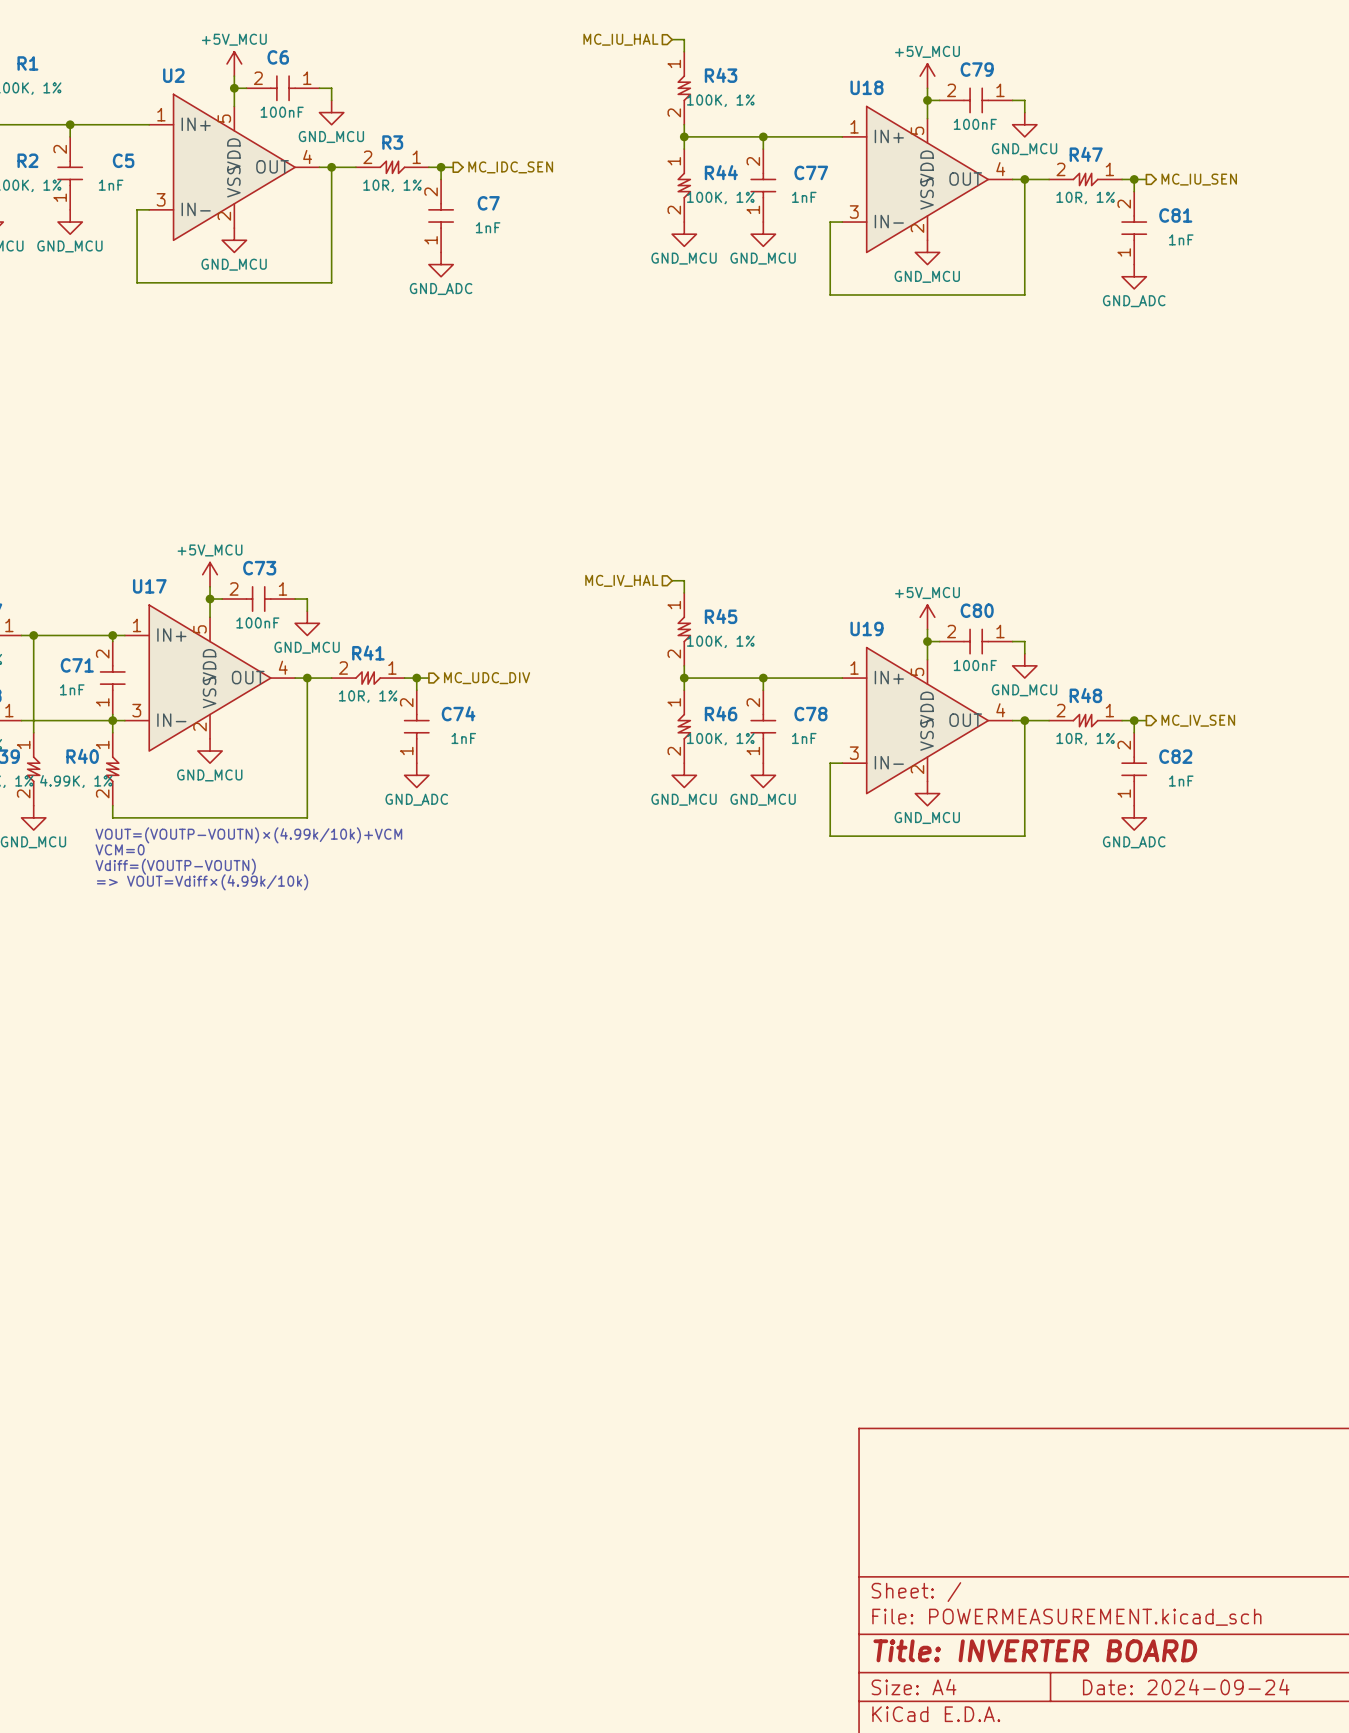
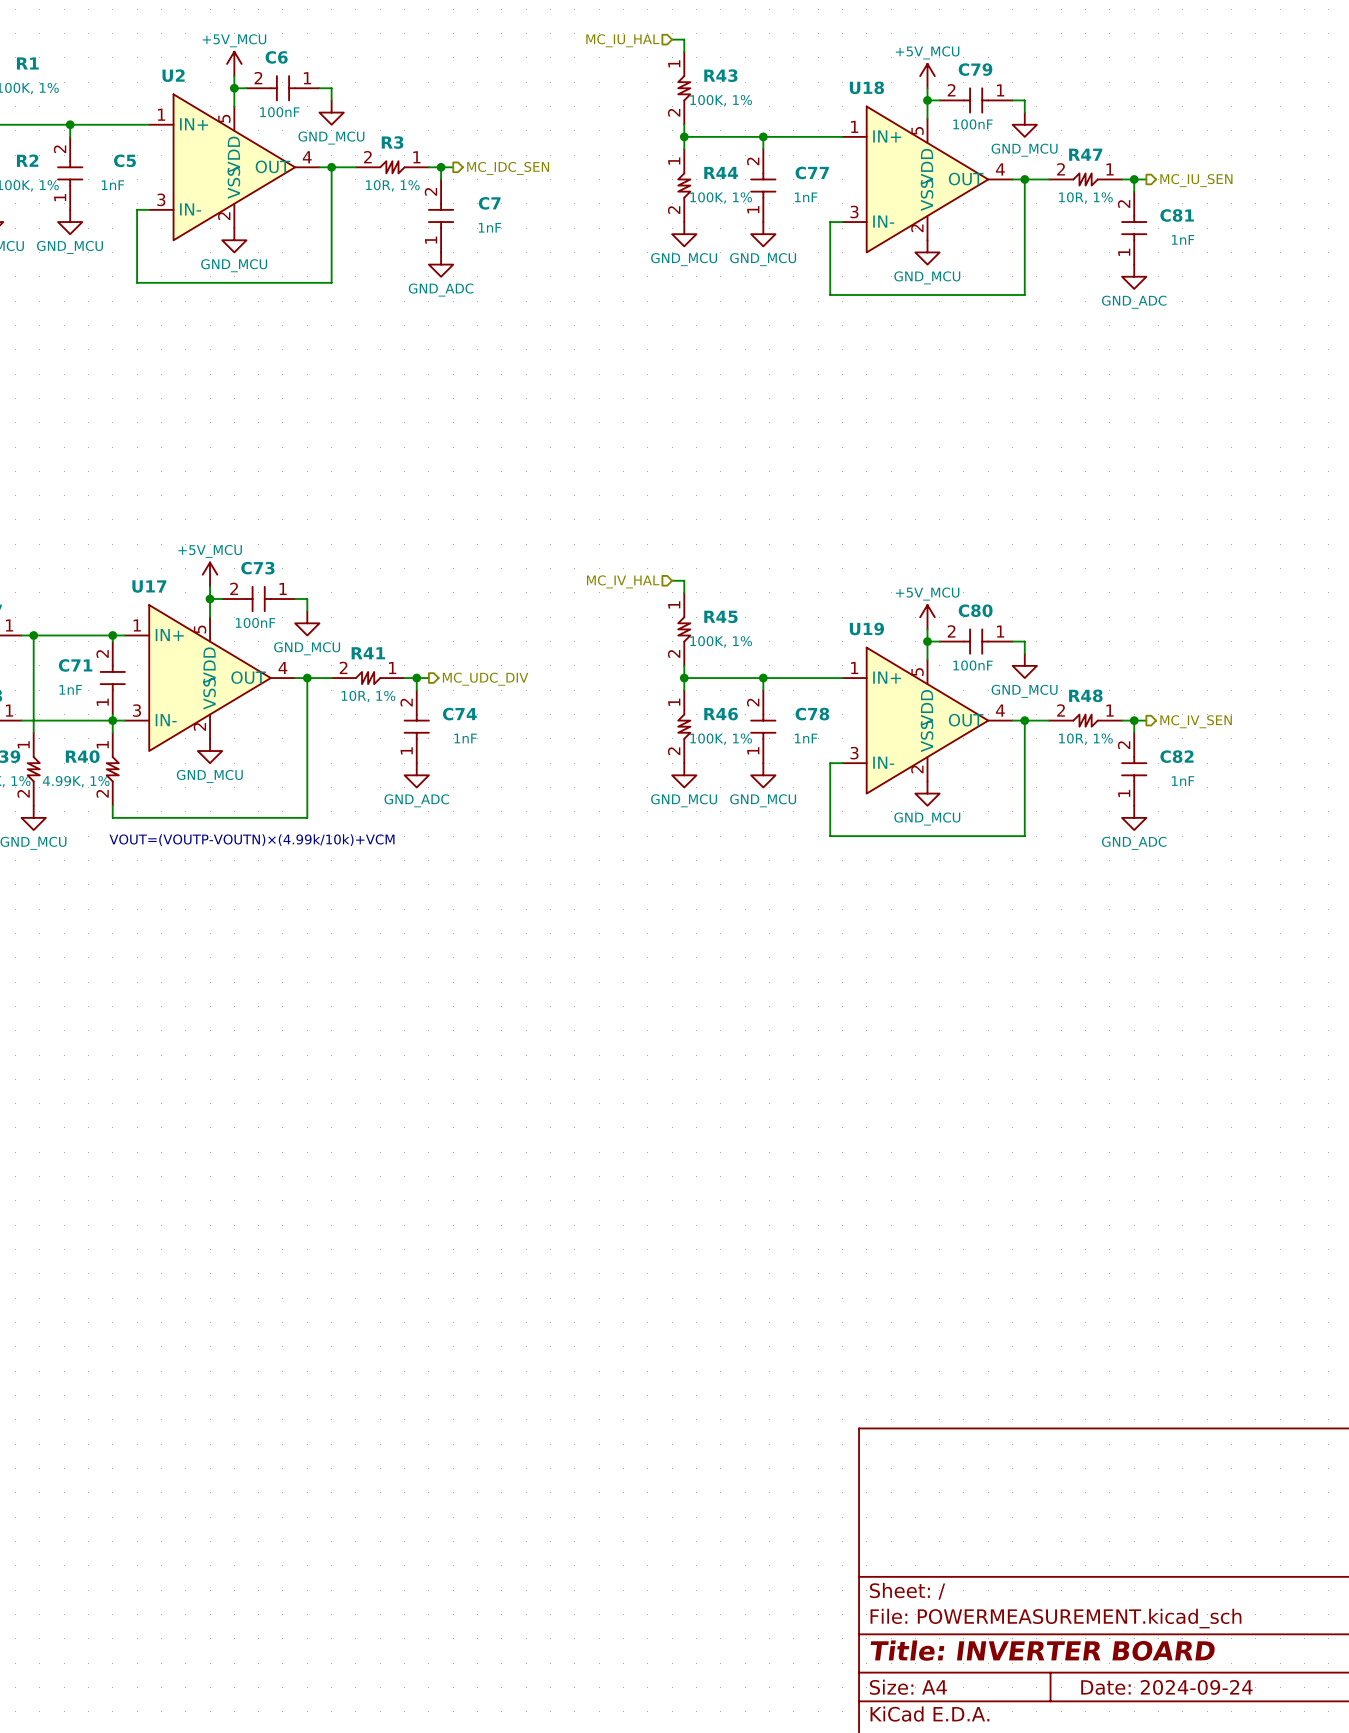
text position: VOUT=(VOUTP-VOUTN)×(4.99k/10k)+VCM (248, 835) -> VOUT=(VOUTP-VOUTN)×(4.99k/10k)+VCM (251, 840)
text: VCM=0 (120, 849) -> none
text: Vdiff=(VOUTP-VOUTN) (175, 866) -> none
text: => VOUT=Vdiff×(4.99k/10k) (202, 882) -> none

